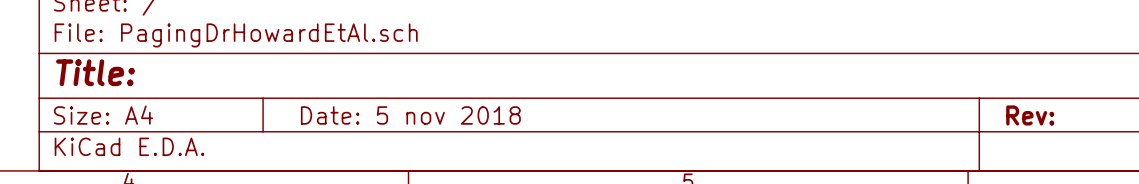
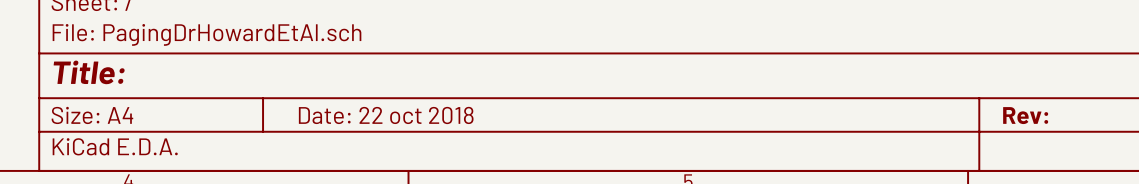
title block: Date: 5 nov 2018 (410, 115) -> Date: 22 oct 2018 (386, 115)

